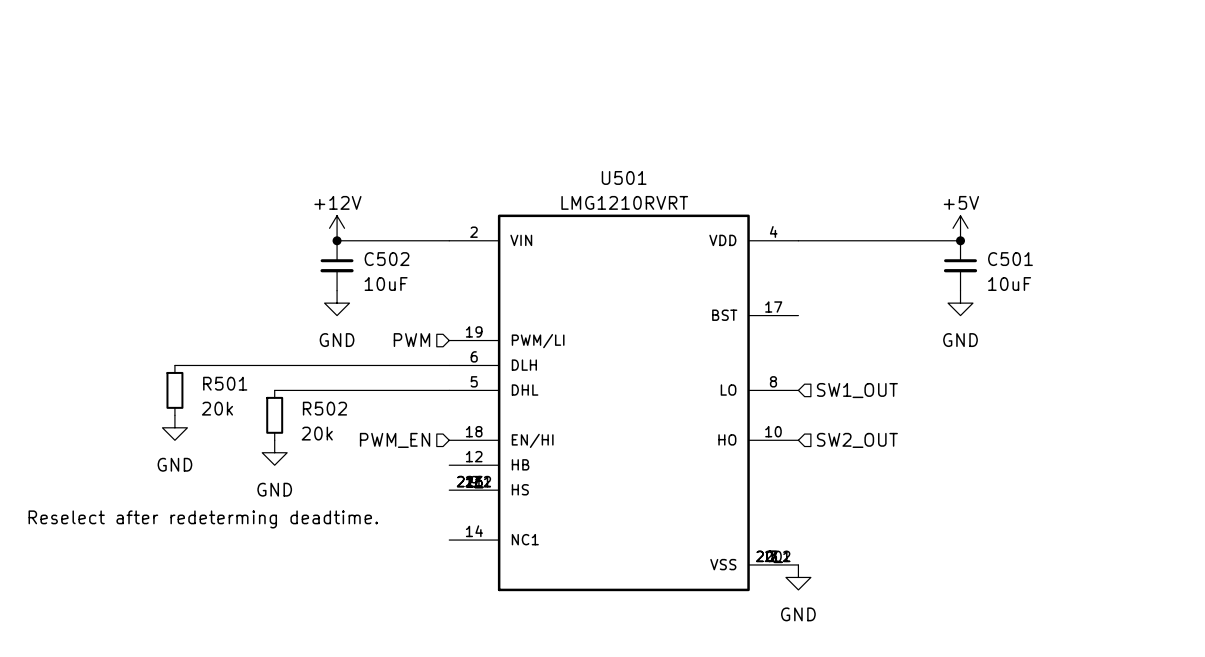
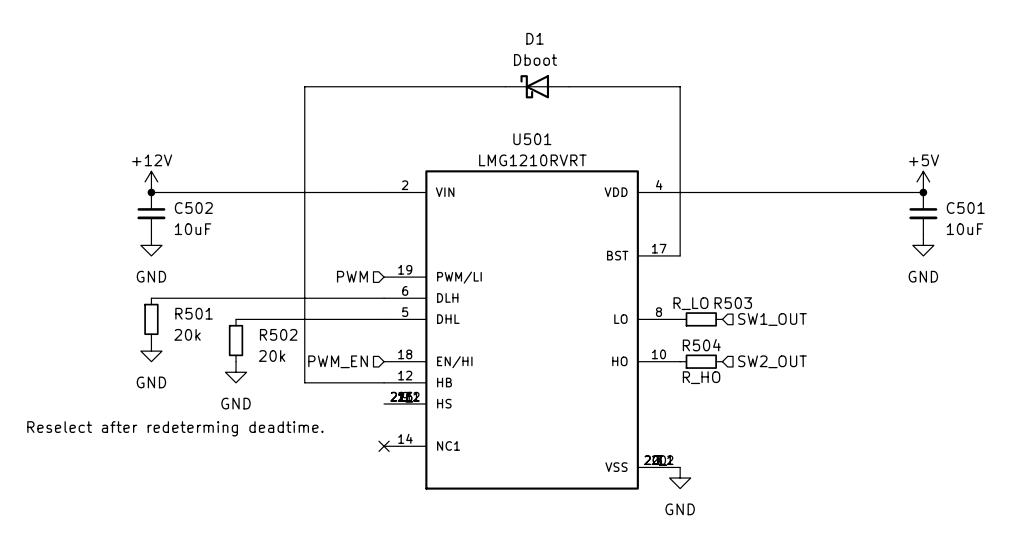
wire: none -> (505, 86) (304, 86) (304, 382) (384, 382)
D1: none -> Dboot (537, 86)
wire: none -> (569, 86) (680, 86) (680, 255)
power symbol position: +12V (337, 228) -> +12V (151, 181)
power symbol position: +5V (960, 228) -> +5V (923, 181)
wire: none -> (151, 192) (288, 192)
junction: none -> (151, 192)
junction: (337, 240) -> none
wire: none -> (817, 192) (923, 192)
junction: (960, 240) -> none
junction: none -> (923, 192)
C502 position: (337, 265) -> (151, 213)
C501 position: (960, 265) -> (923, 213)
power symbol position: GND (337, 303) -> GND (151, 245)
power symbol position: GND (960, 303) -> GND (923, 245)
R503: none -> R_LO (701, 319)
hierarchical label position: SW1_OUT (857, 390) -> SW1_OUT (772, 319)
R504: none -> R_HO (701, 361)
hierarchical label position: SW2_OUT (857, 440) -> SW2_OUT (772, 361)
no-connect mark: none -> (384, 446)

